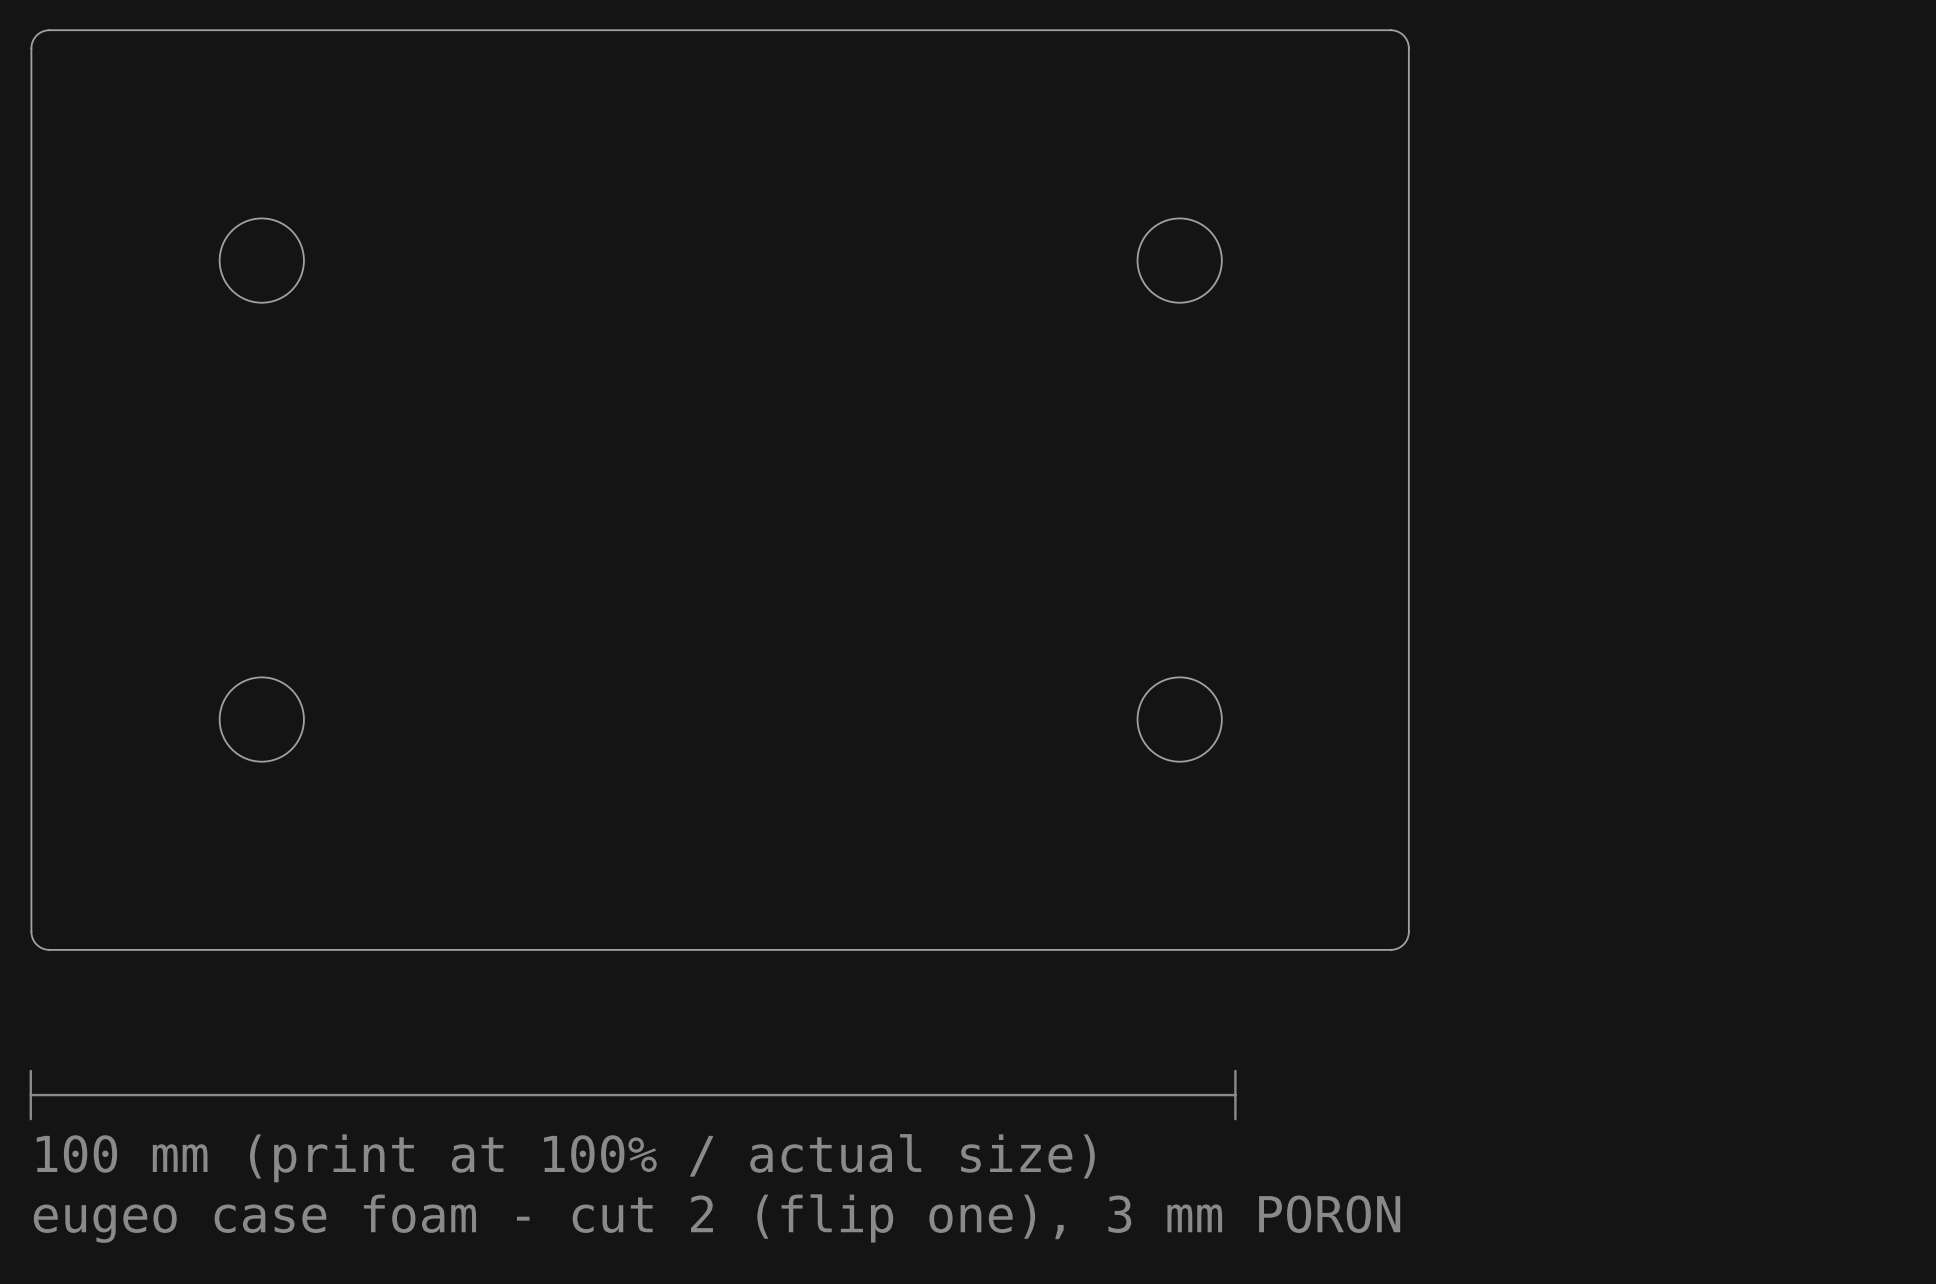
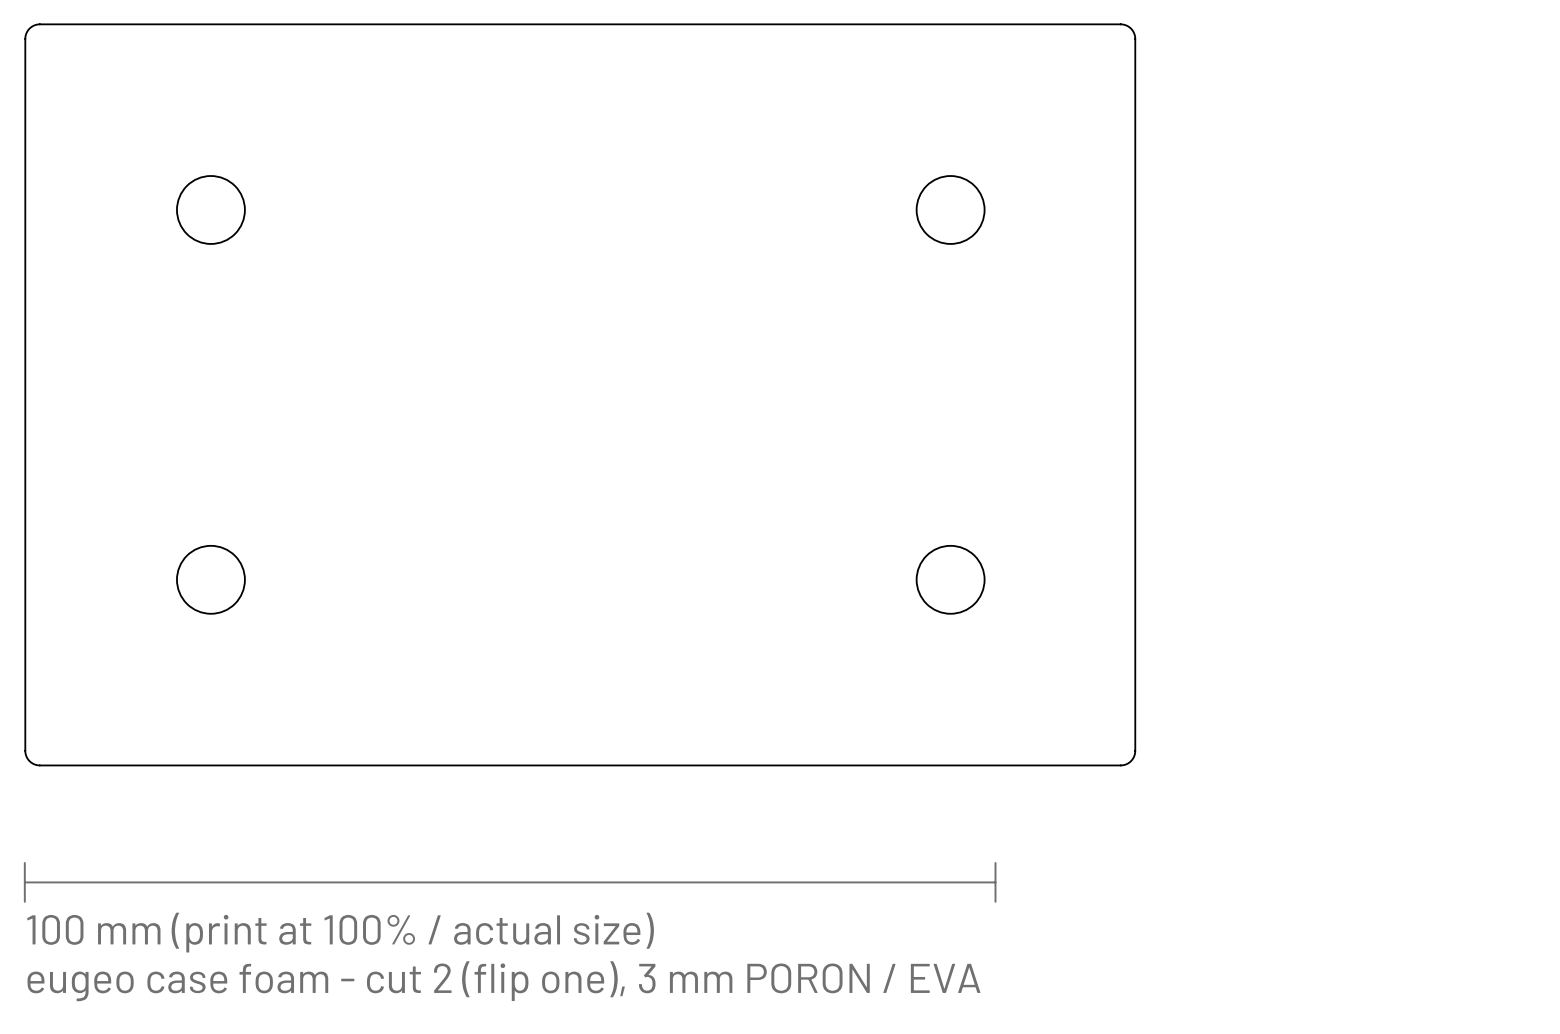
text: eugeo case foam - cut 2 (flip one), 3 mm PORON (716, 1218) -> eugeo case foam - cut 2 (flip one), 3 mm PORON / EVA (503, 981)

